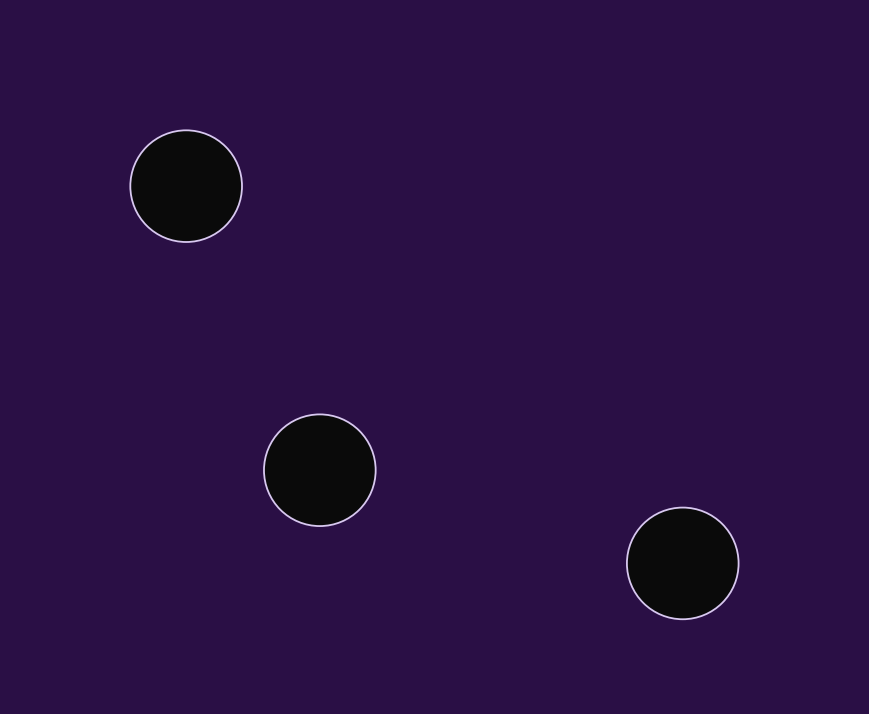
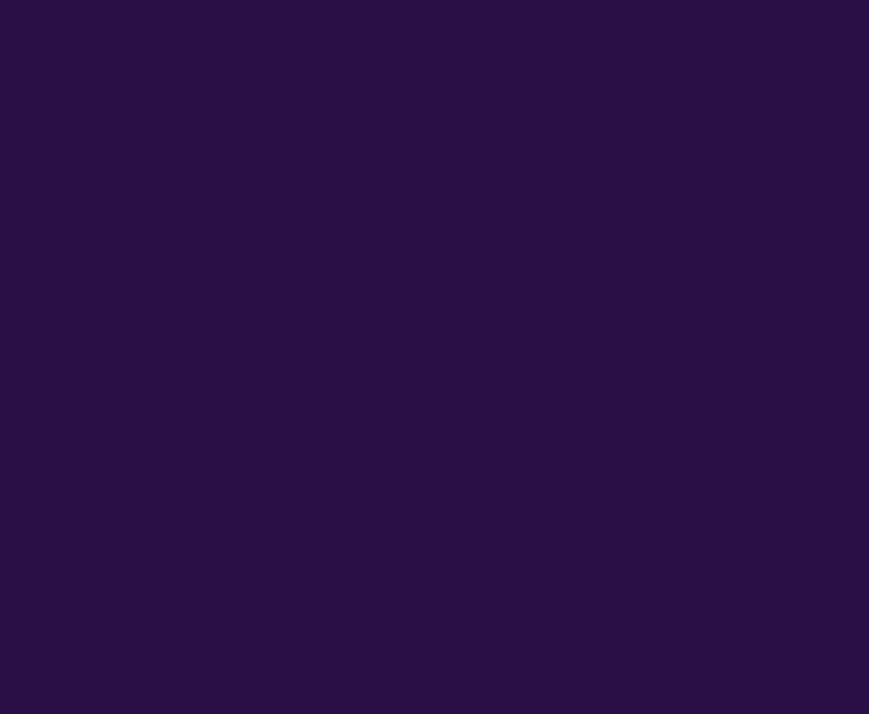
part: (186, 186) -> none
part: (319, 470) -> none
part: (682, 563) -> none

